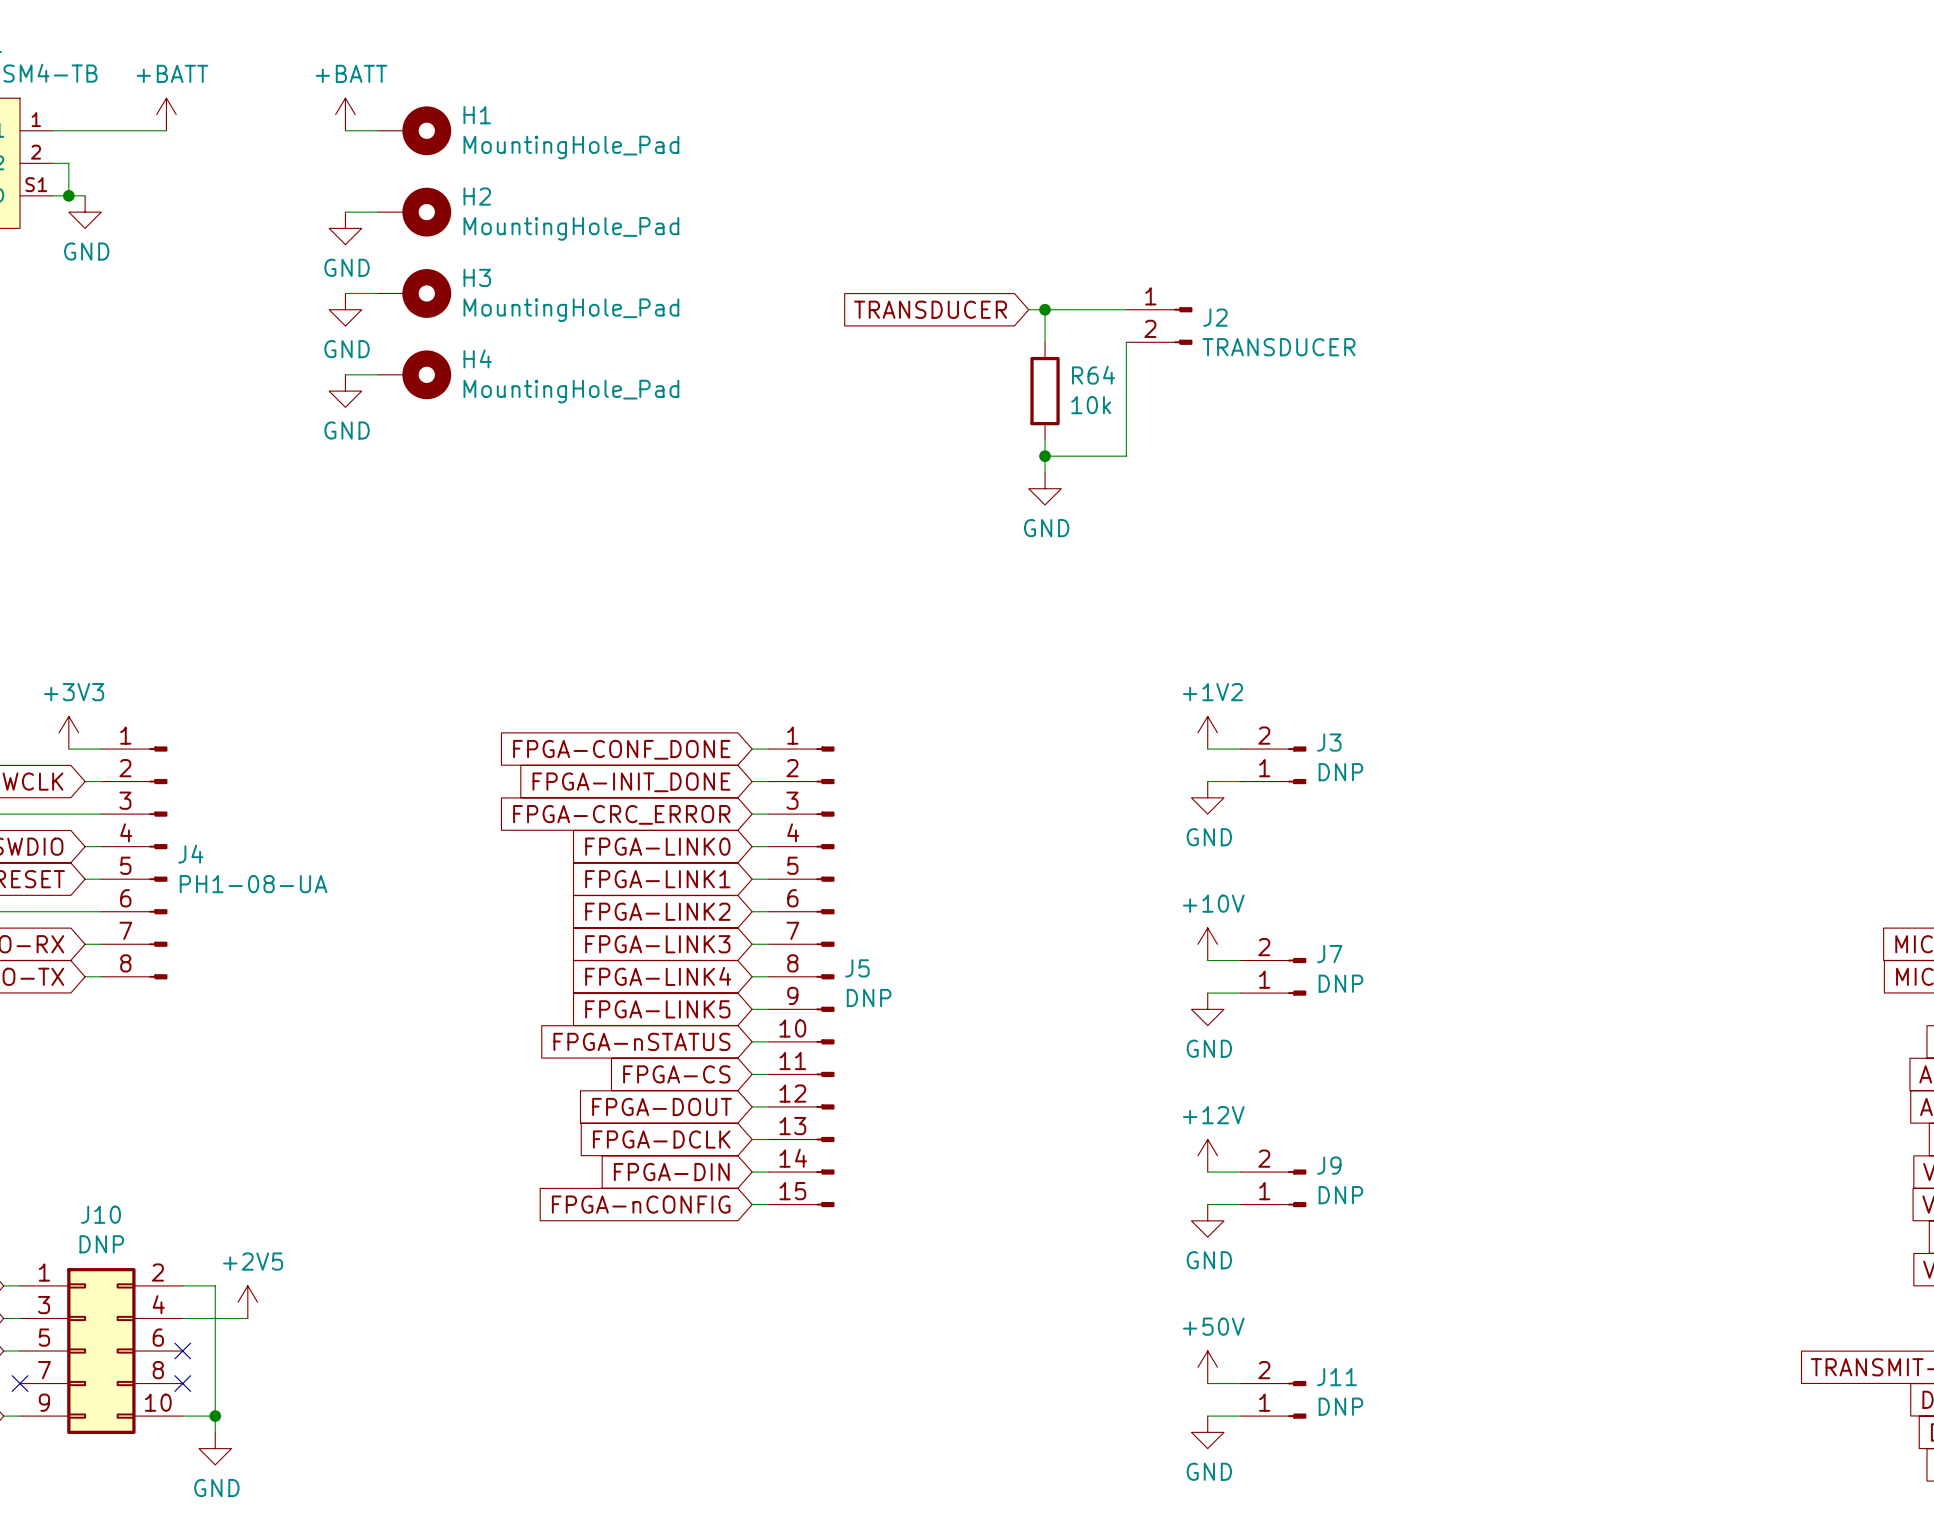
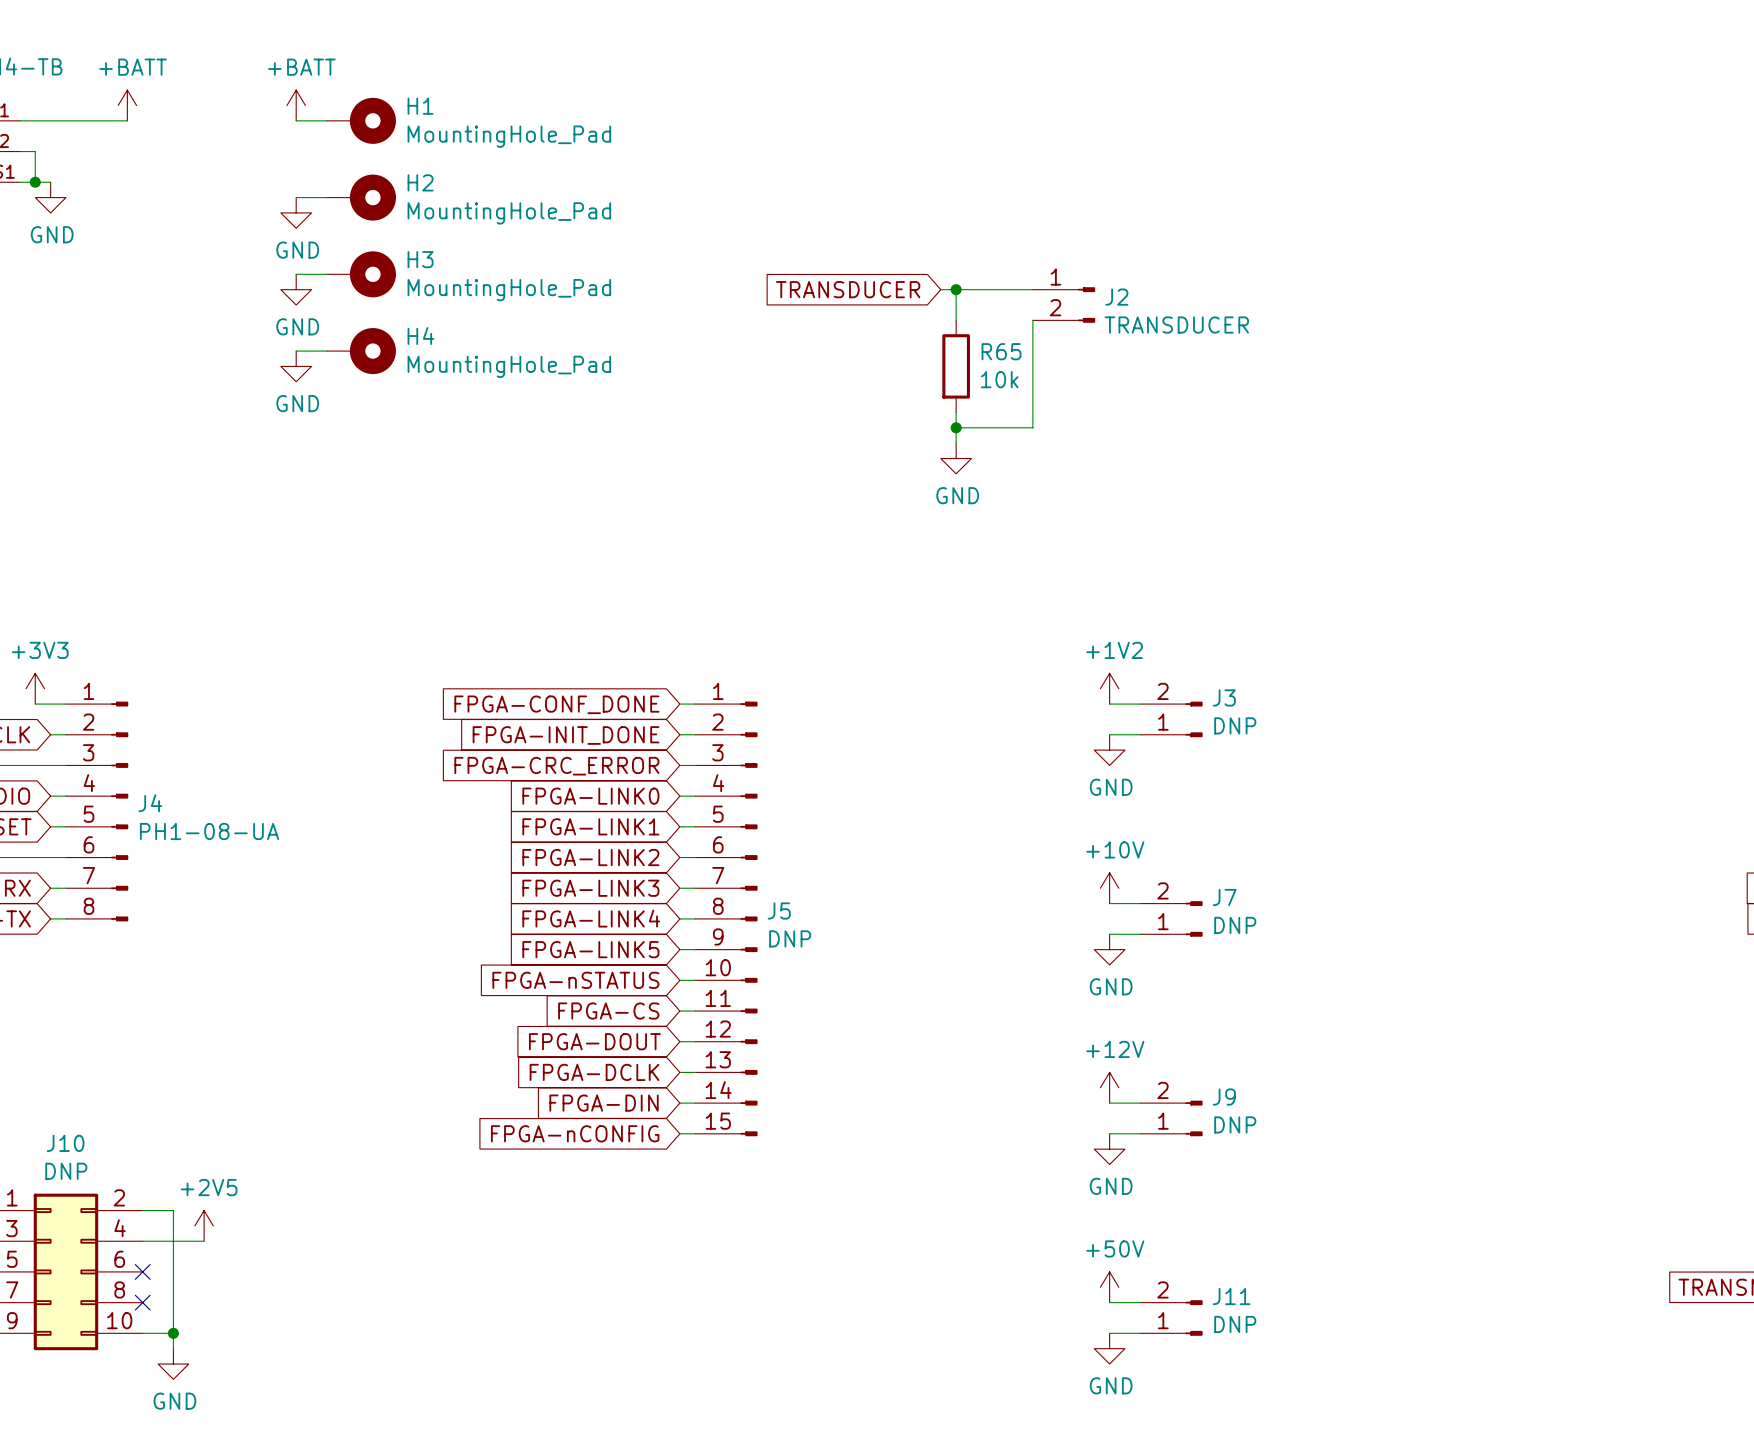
R64 name: R64 (1093, 375) -> R65 (1001, 351)

